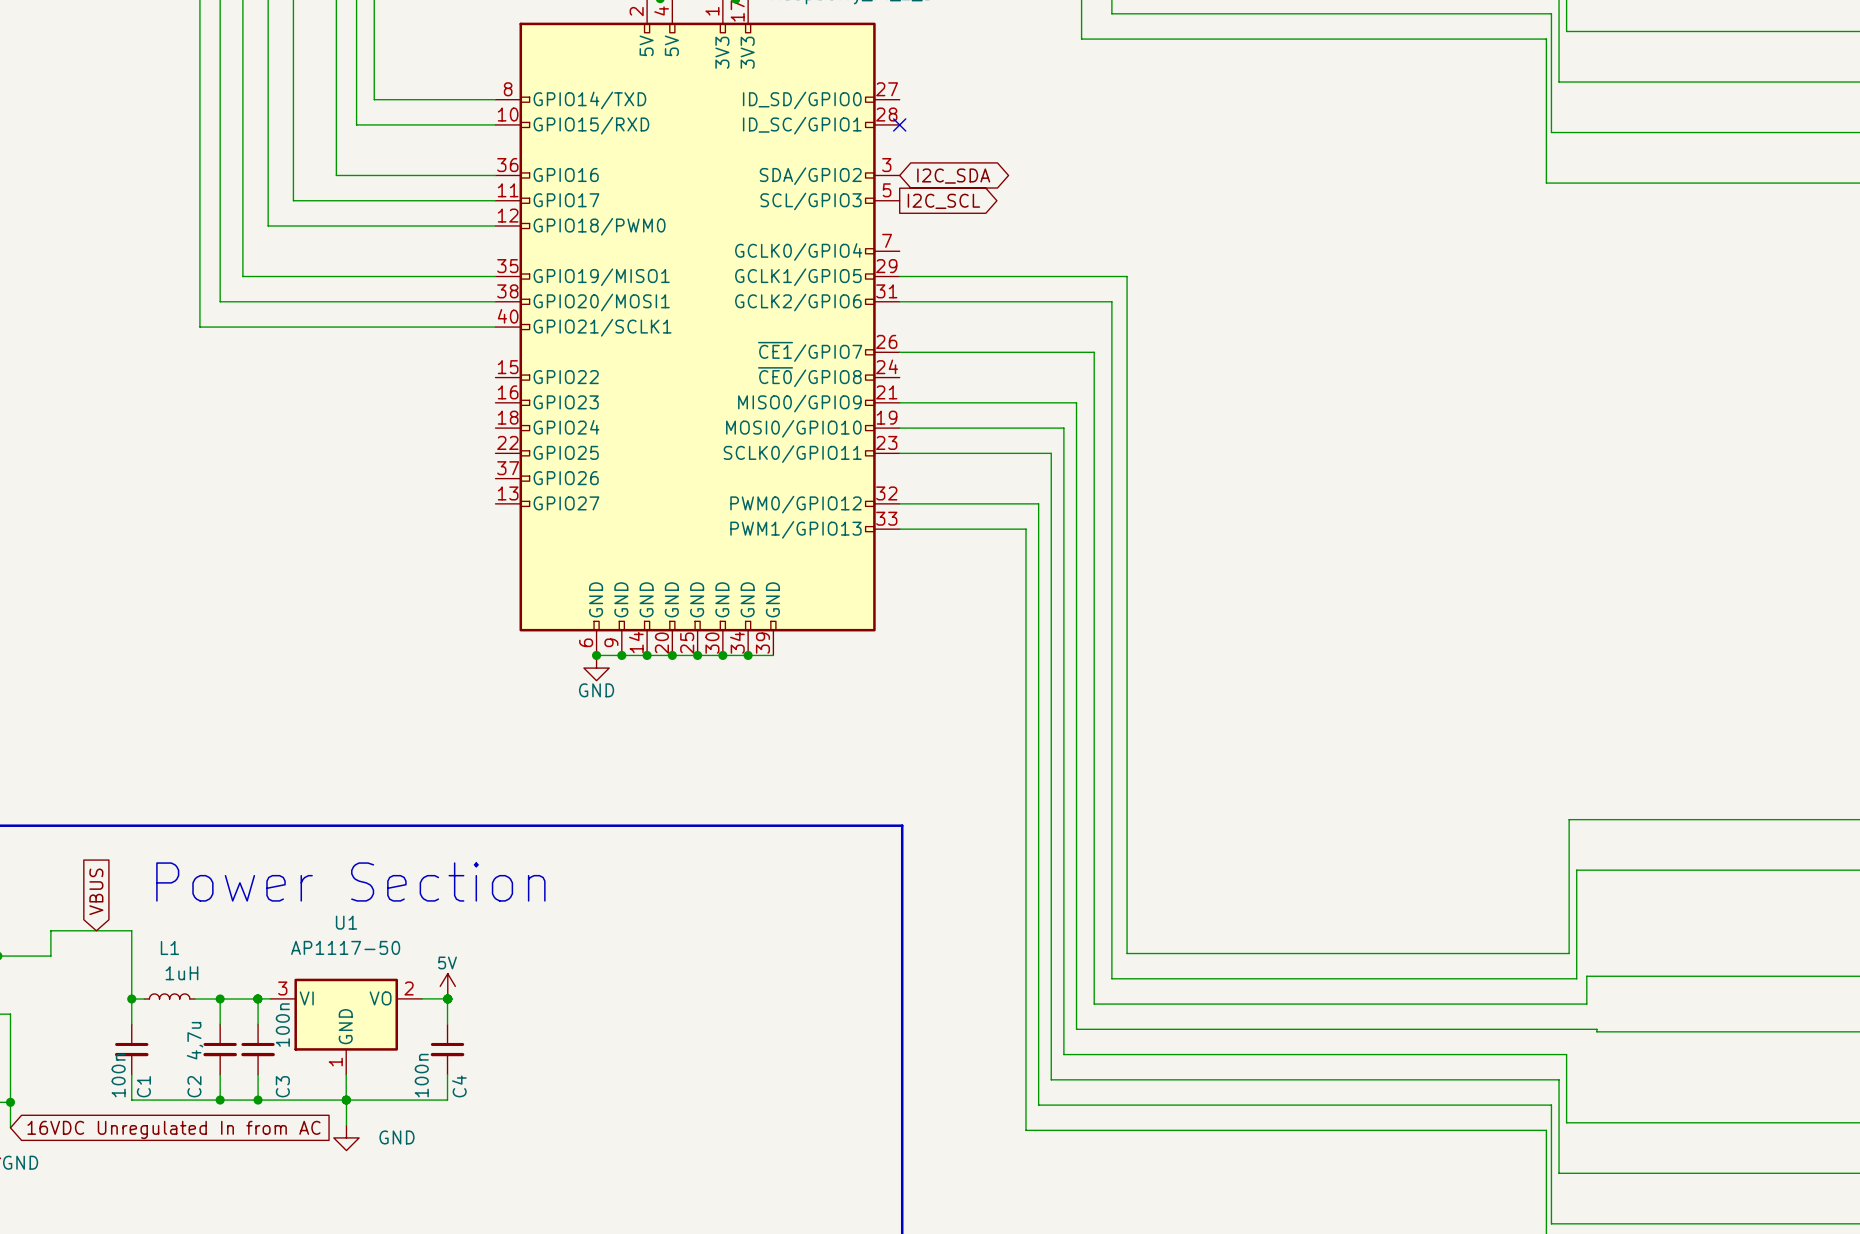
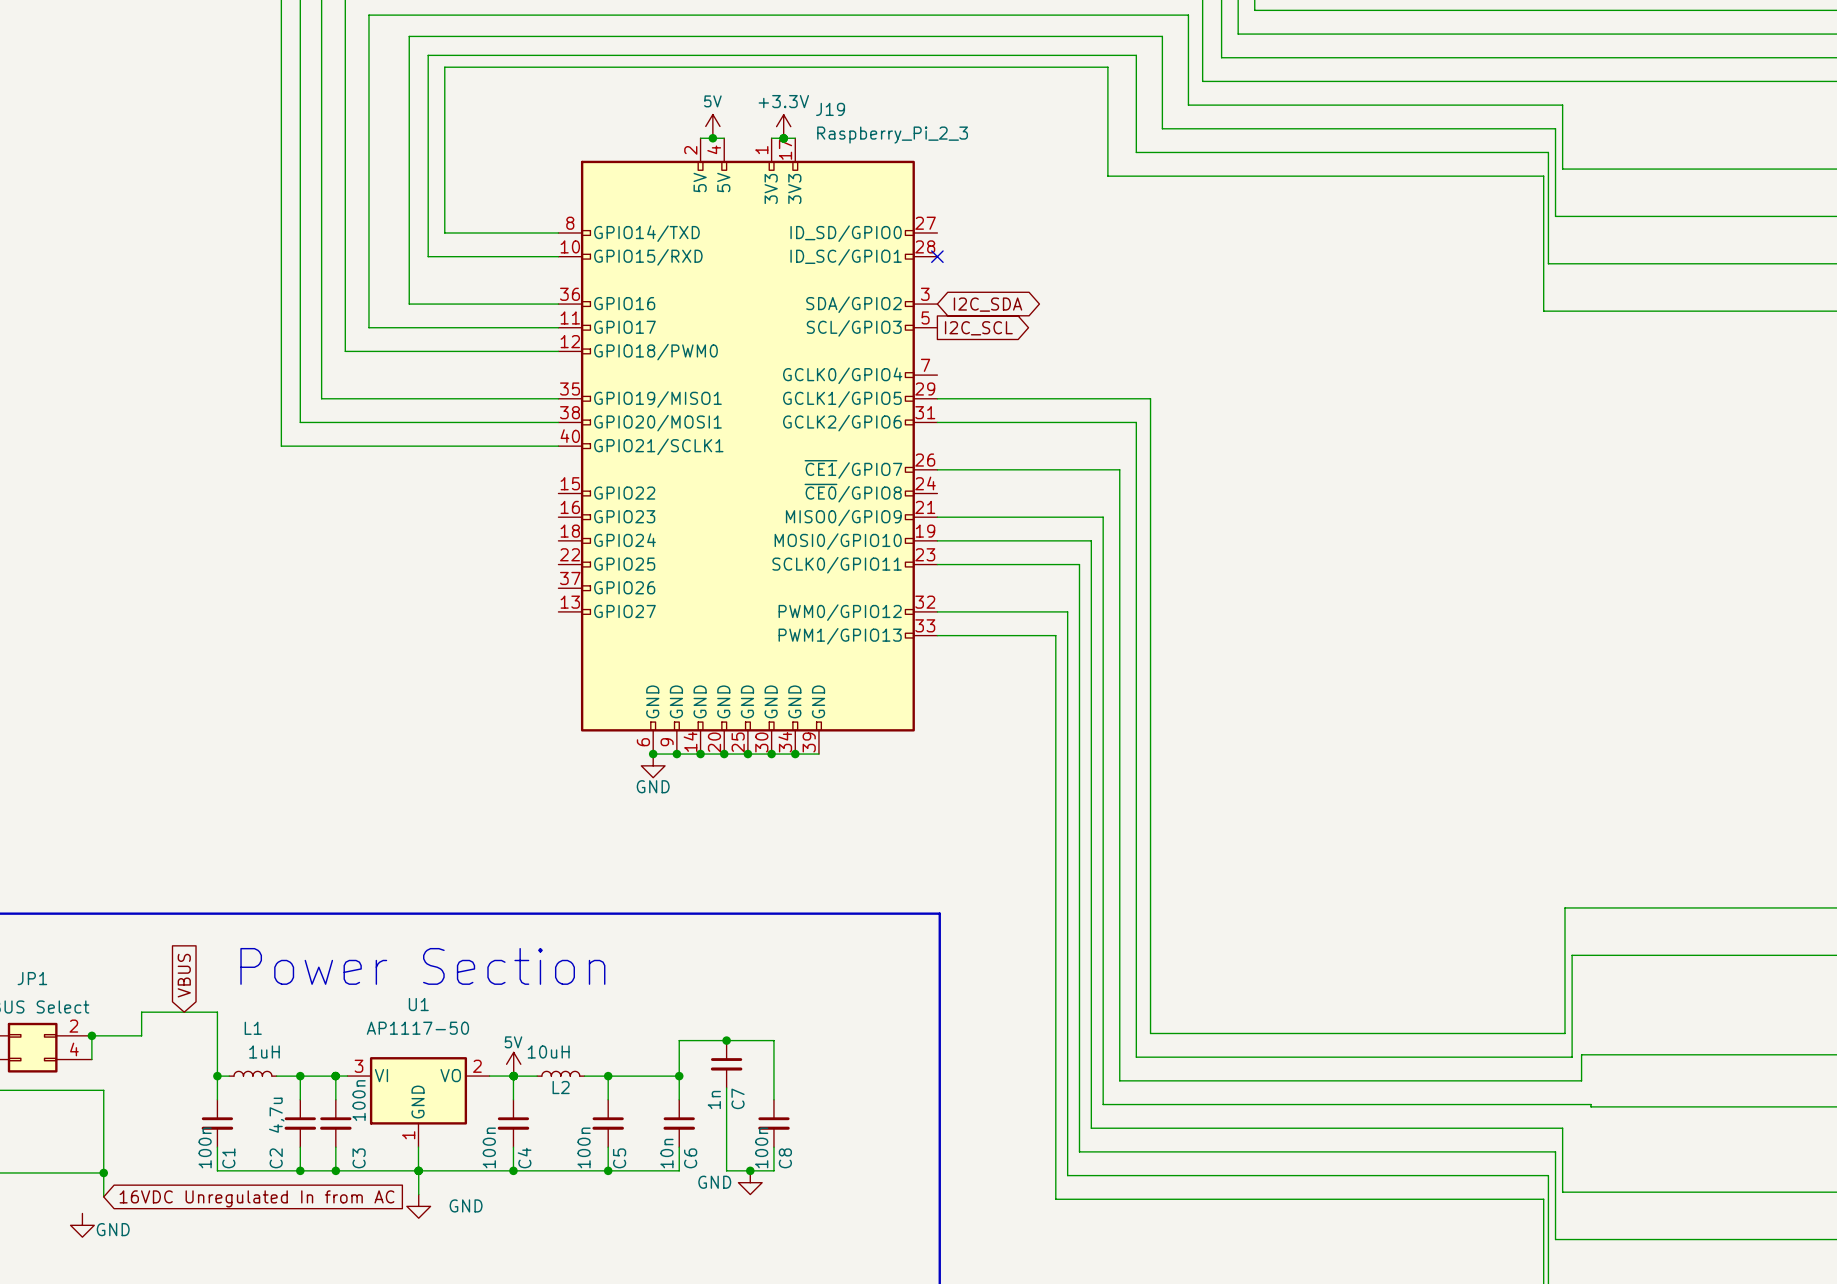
junction: none -> (726, 1040)
C7: none -> 1n (726, 1064)
L2: none -> 10uH (560, 1073)
wire: none -> (513, 1076) (537, 1076)
wire: none -> (584, 1076) (679, 1076)
wire: none -> (608, 1076) (608, 1099)
junction: none -> (608, 1076)
junction: none -> (679, 1076)
wire: none -> (726, 1087) (726, 1170) (773, 1170) (773, 1147)
wire: none -> (679, 1099) (679, 1040) (773, 1040) (773, 1099)
C5: none -> 100n (608, 1123)
C6: none -> 10n (679, 1123)
C8: none -> 100n (773, 1123)
wire: none -> (608, 1147) (608, 1170)
wire: none -> (679, 1147) (679, 1170) (513, 1170)
junction: none -> (513, 1170)
junction: none -> (608, 1170)
junction: none -> (750, 1170)
power symbol: none -> GND (750, 1182)

